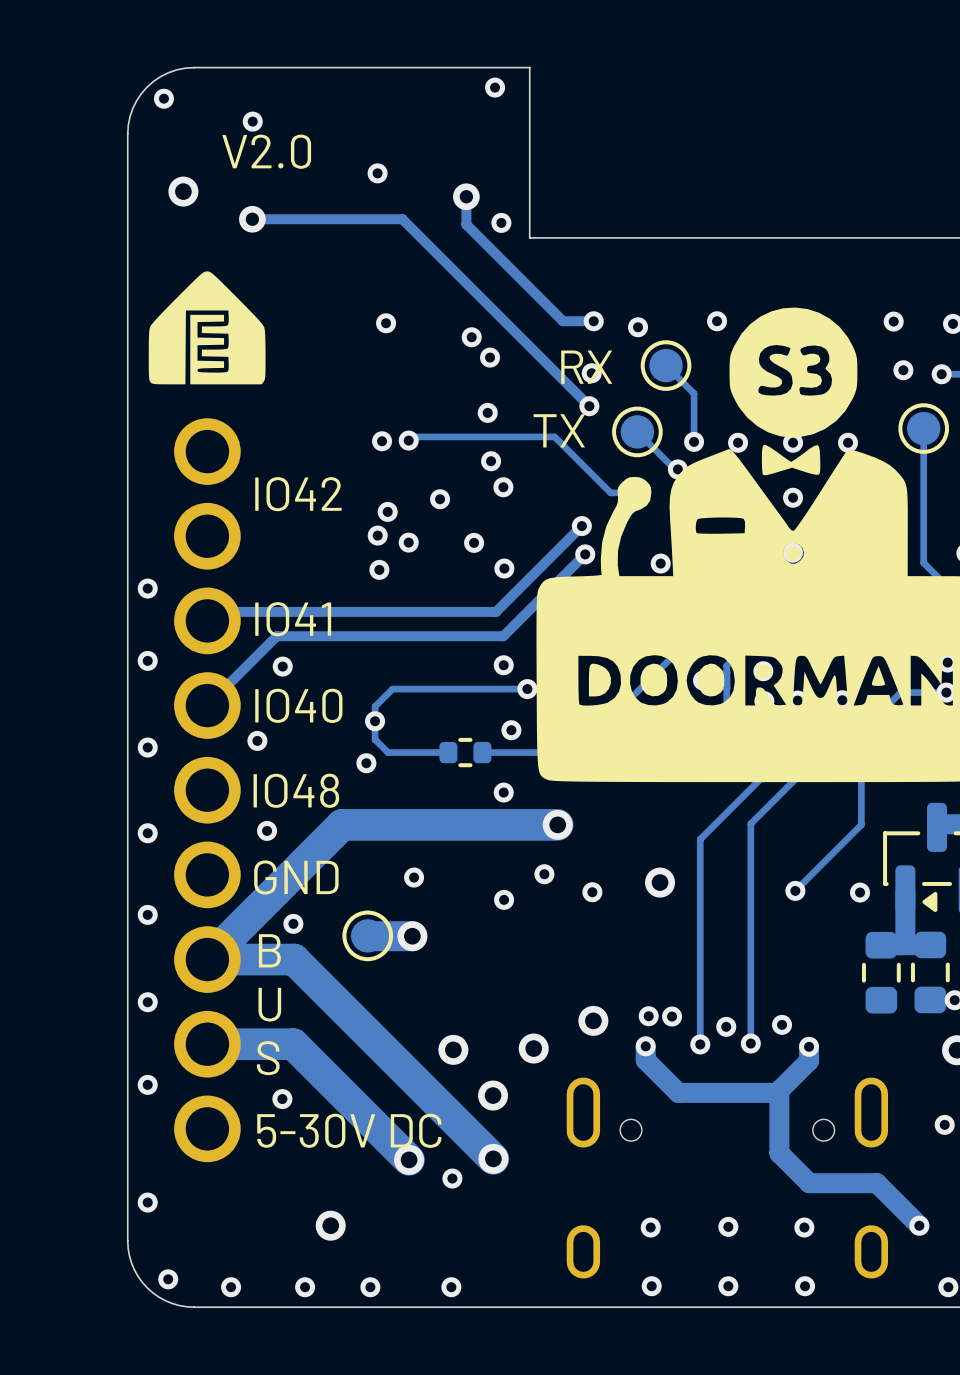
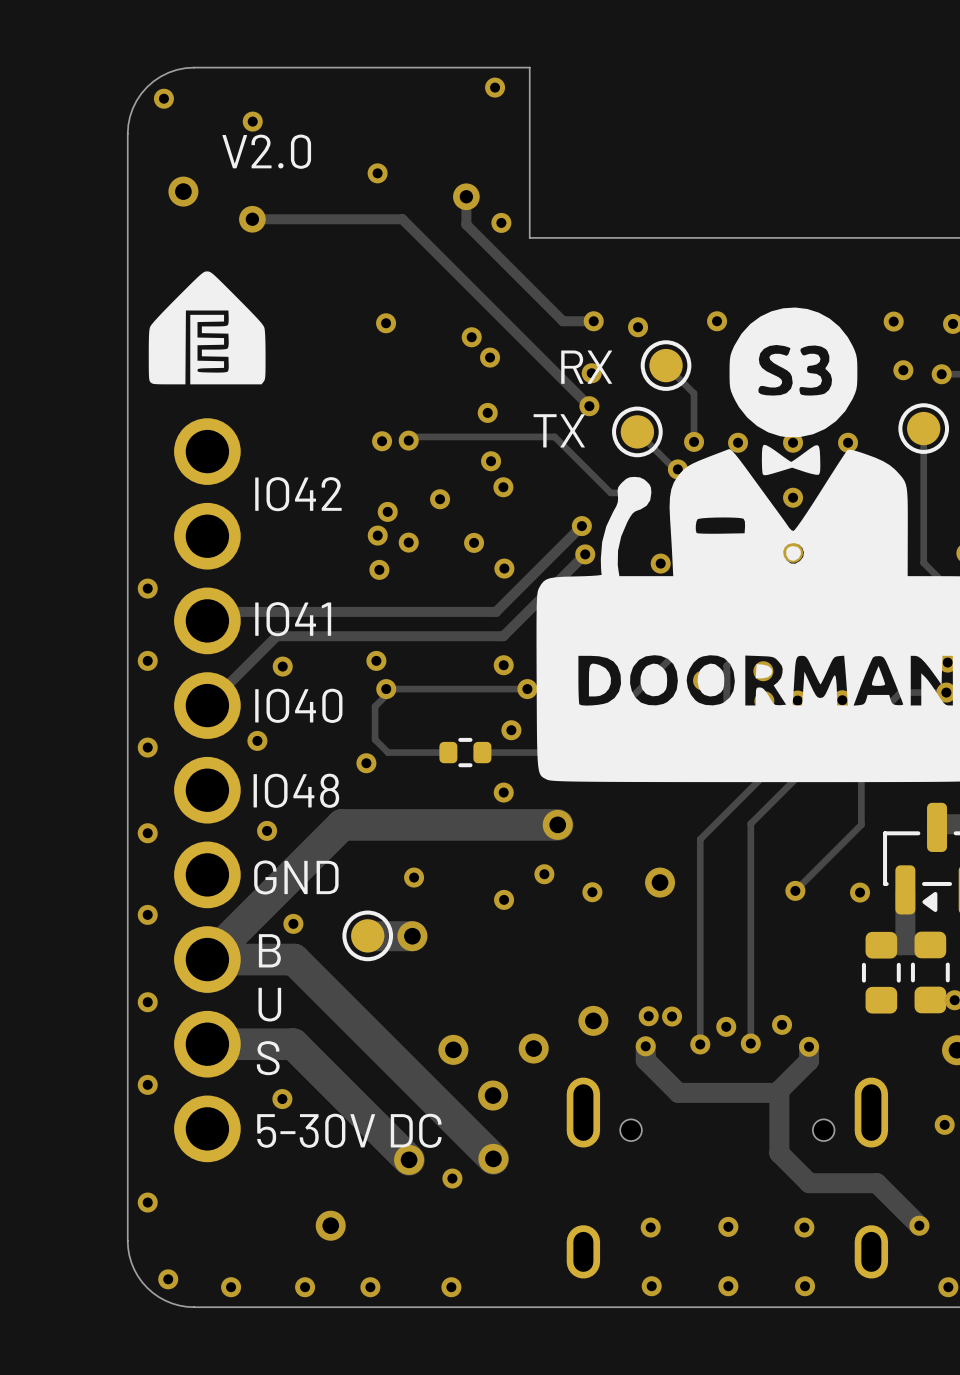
via: none -> (376, 660)
via: none -> (386, 689)
via: (375, 721) -> none

